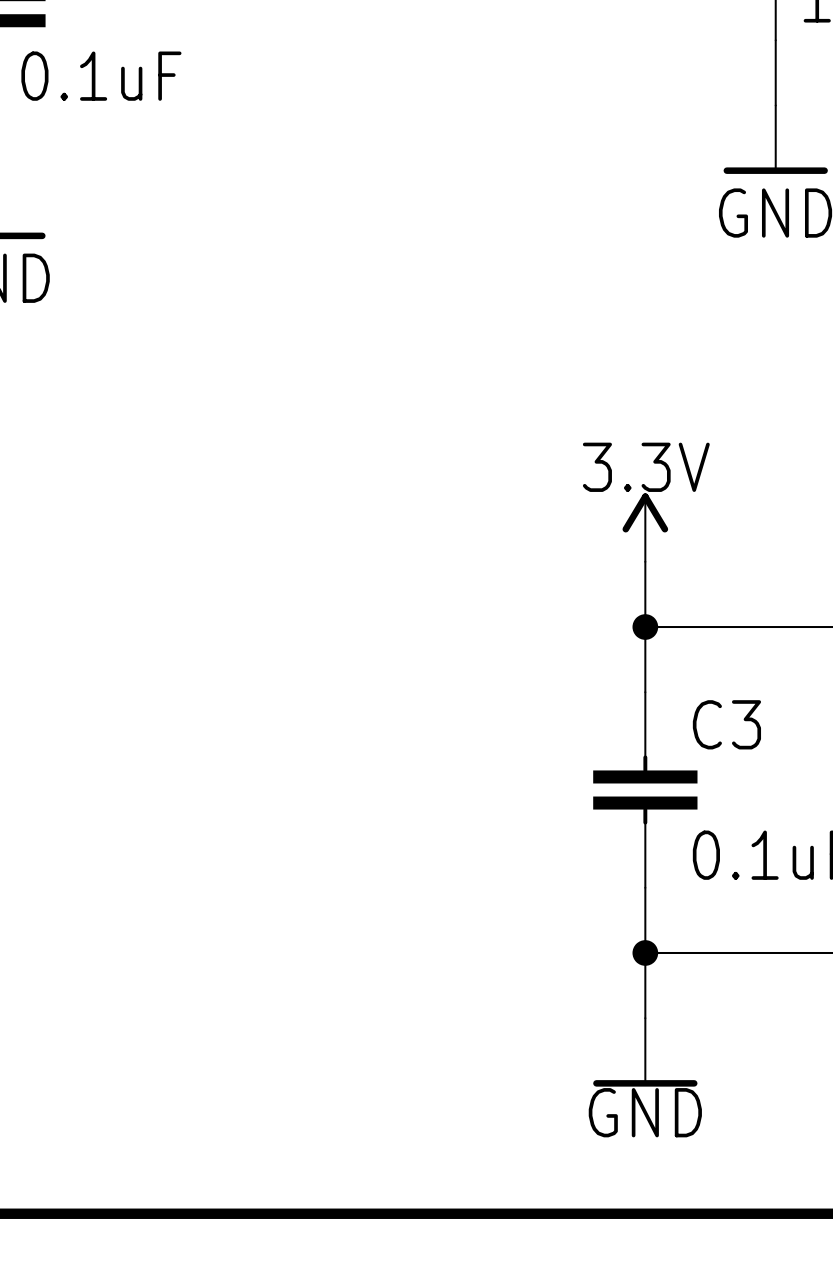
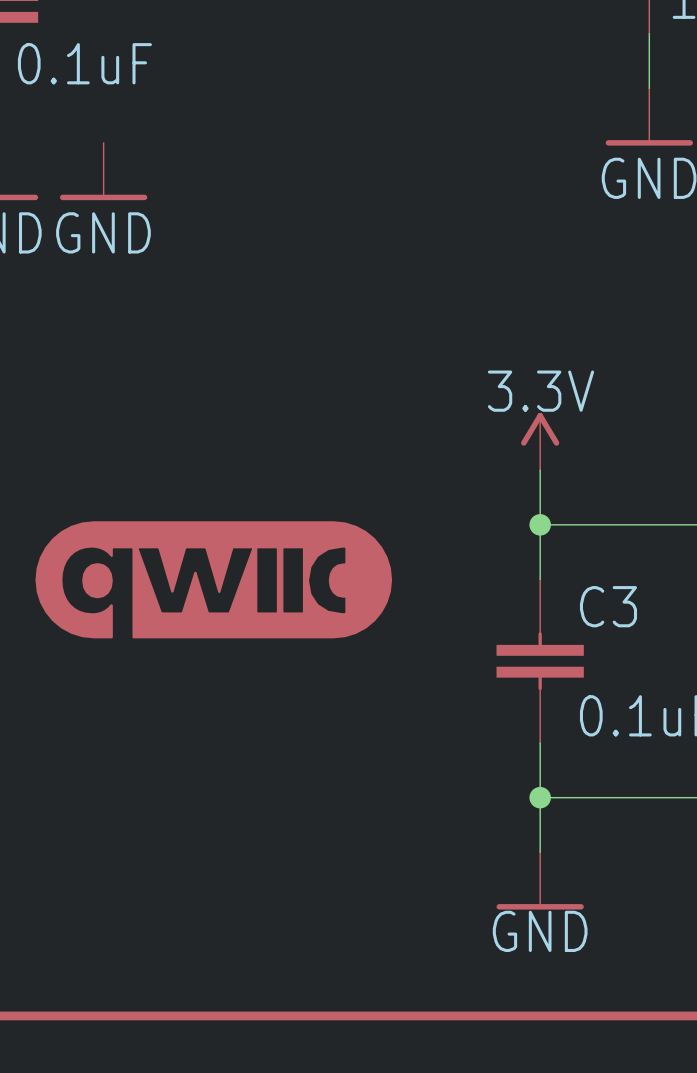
power symbol: none -> GND (103, 171)
part: none -> (213, 579)

